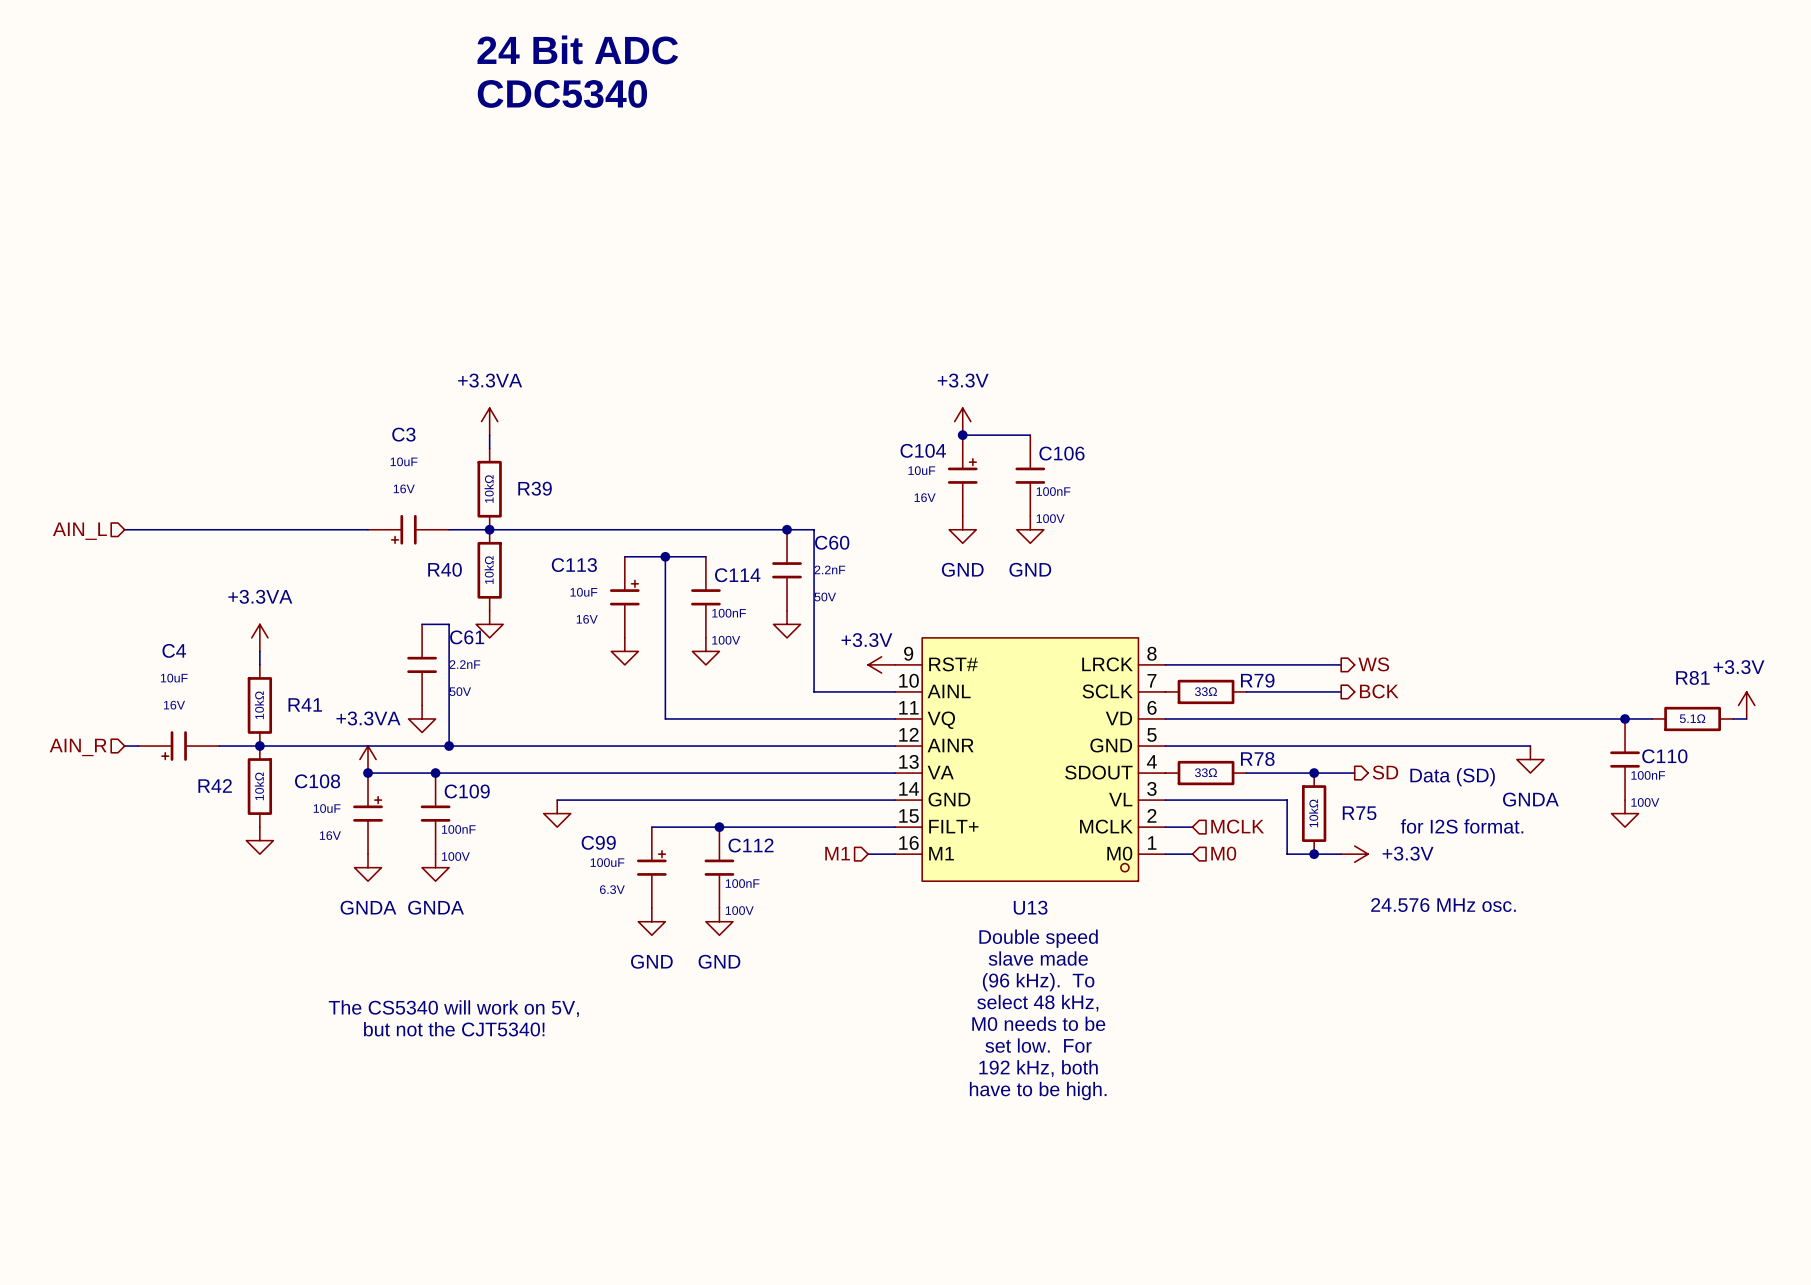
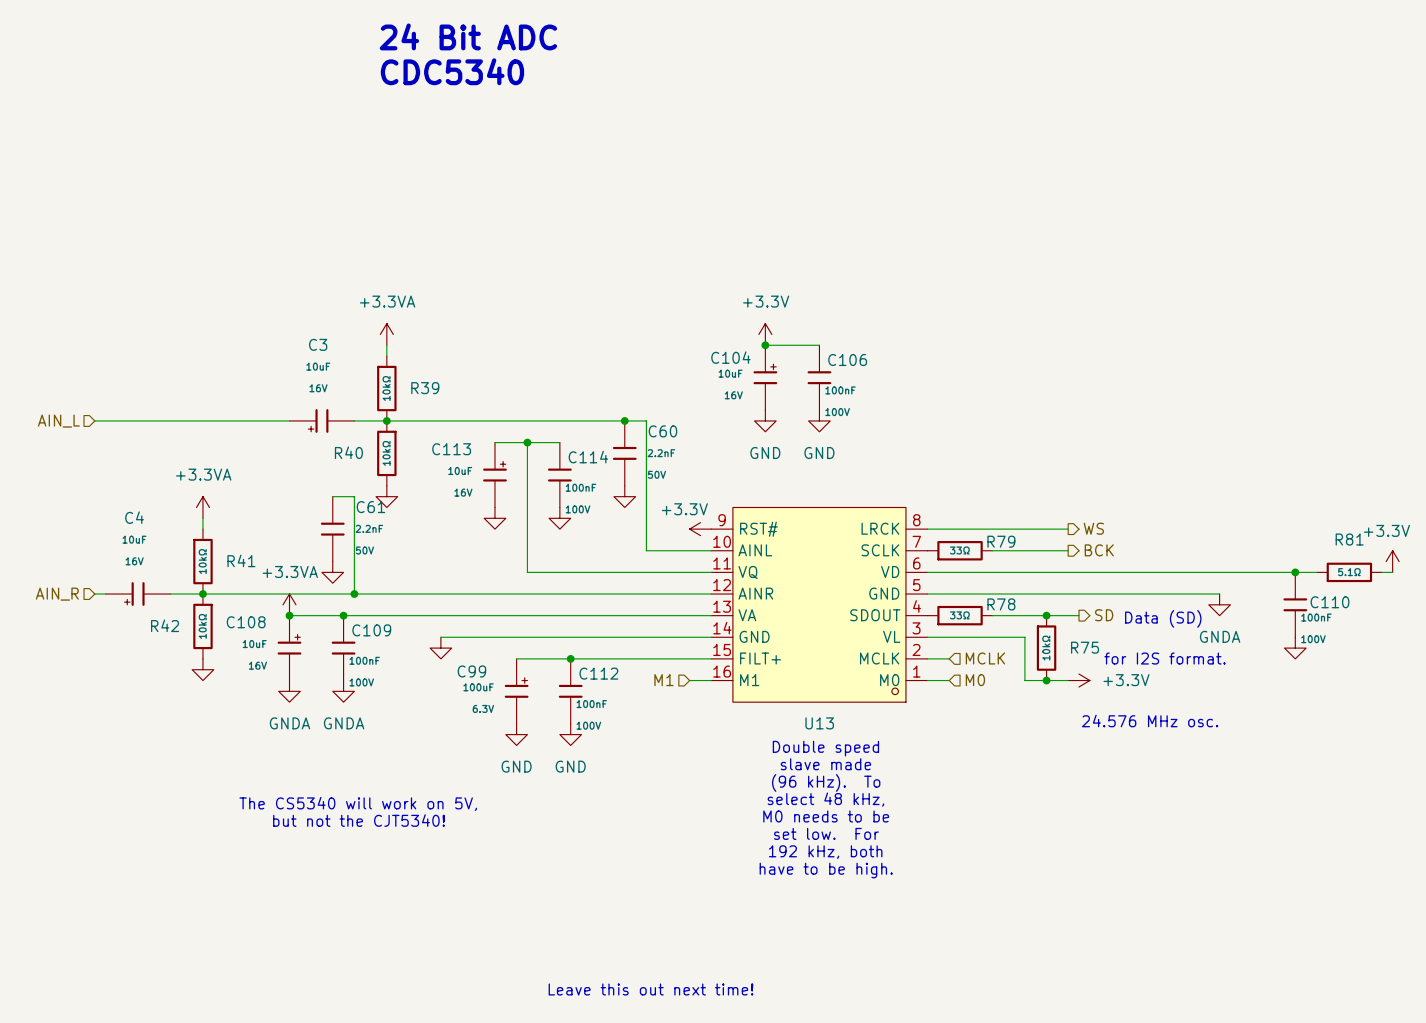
text: none -> Leave this out next time! (650, 989)

